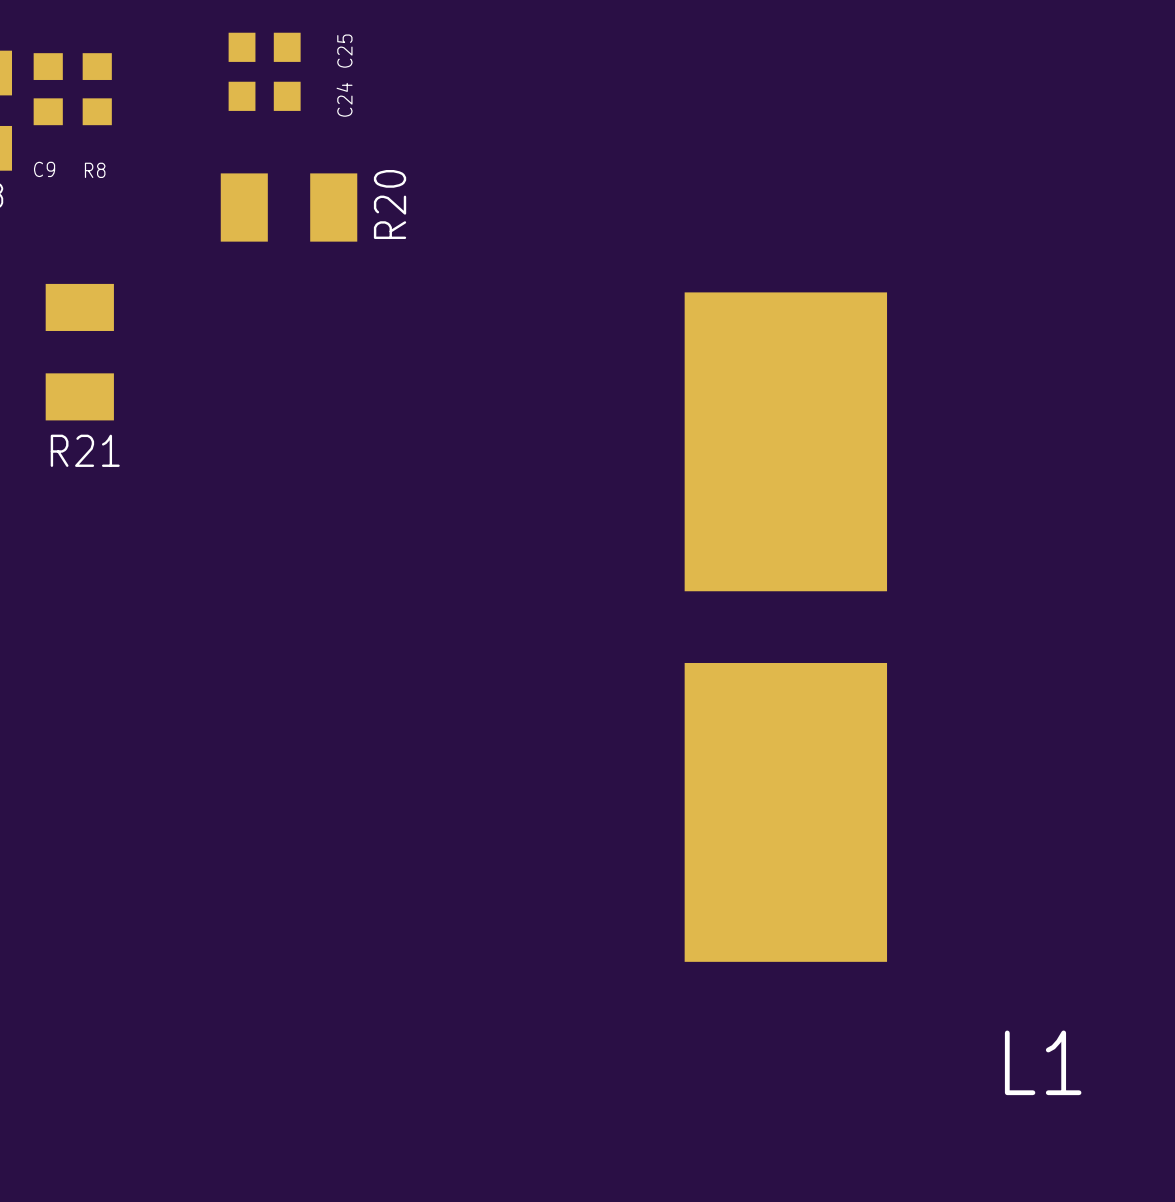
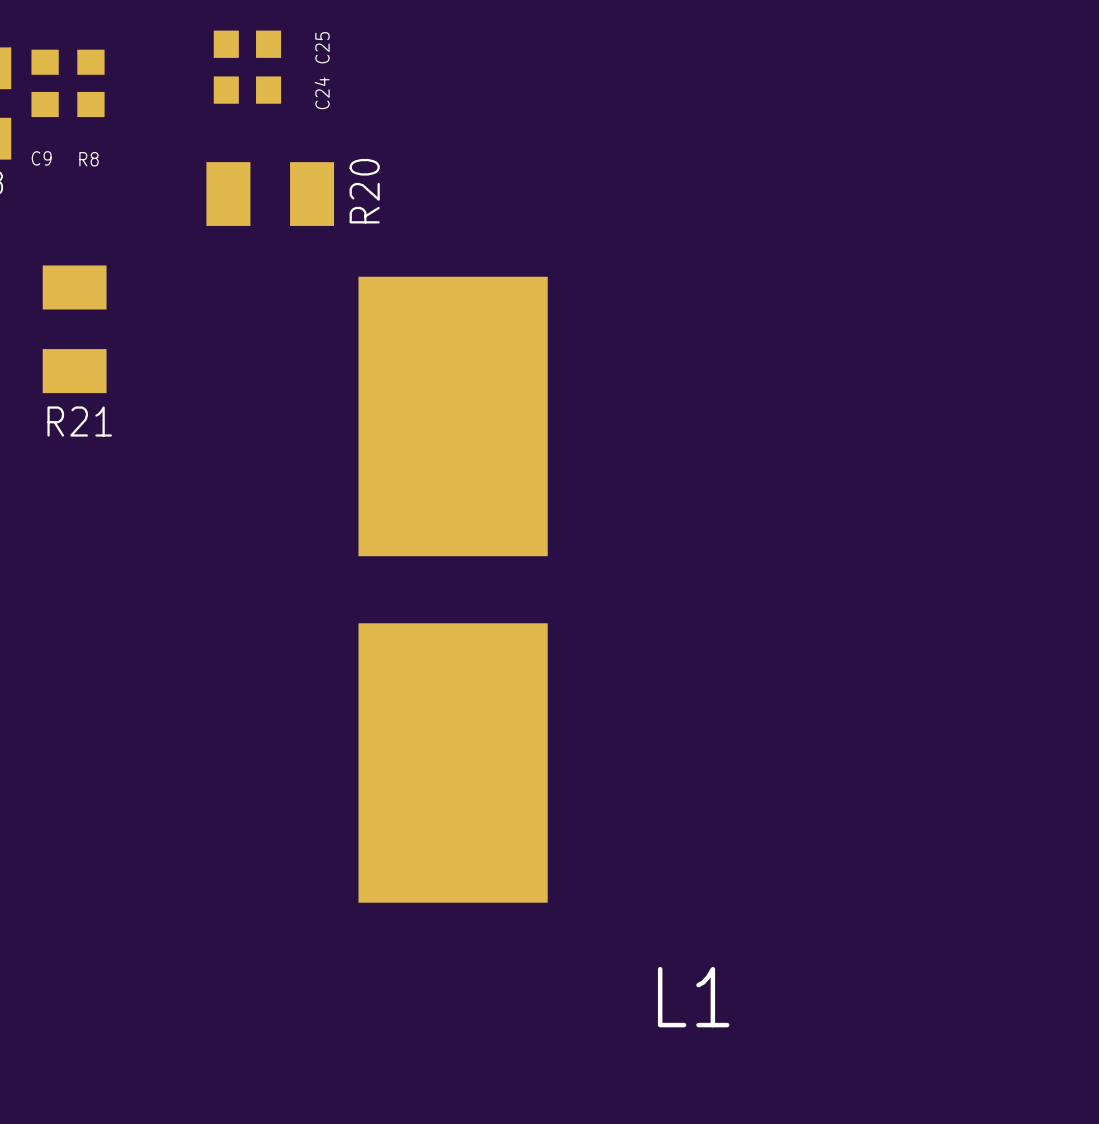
L1 position: (785, 627) -> (453, 589)

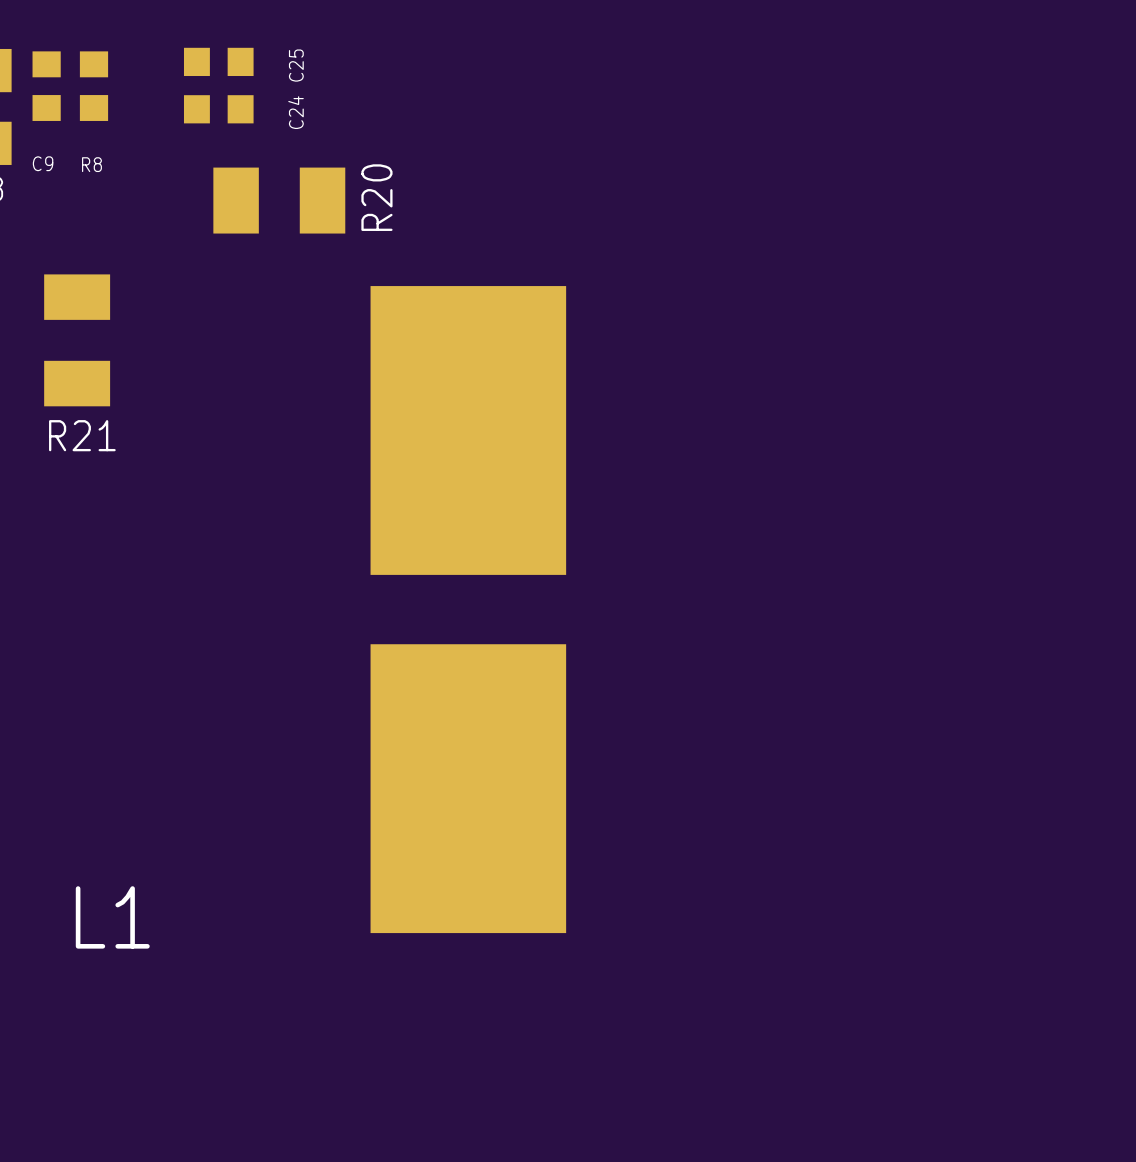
C25 position: (247, 44) -> (218, 61)
C24 position: (247, 90) -> (218, 109)
L1 name position: L1 (693, 997) -> L1 (112, 917)

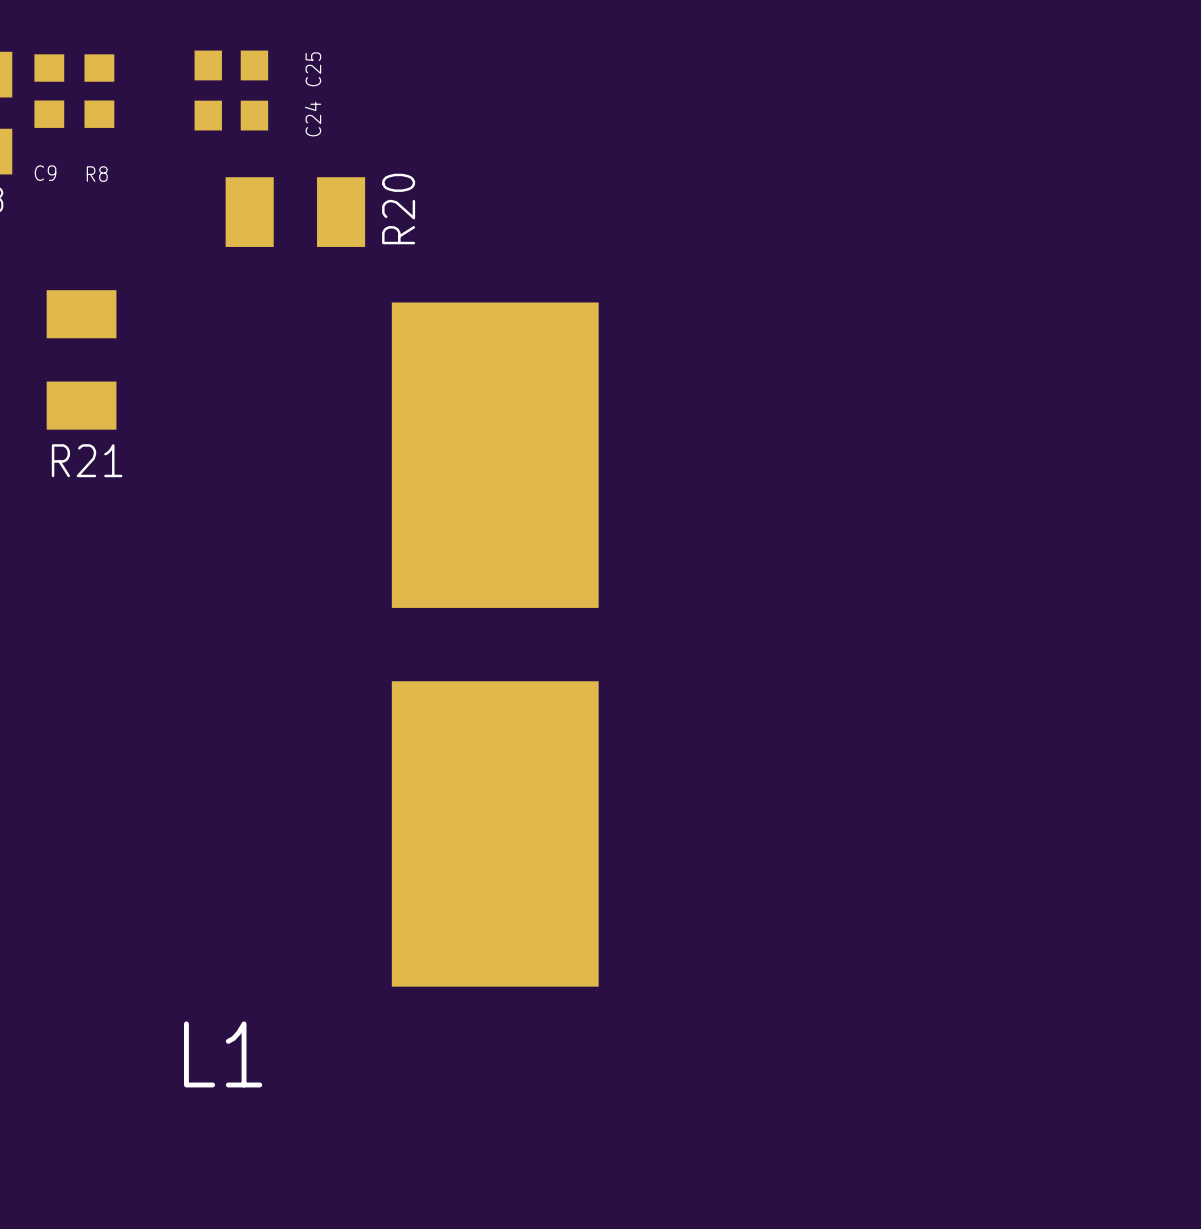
L1 name position: L1 (112, 917) -> L1 (223, 1054)

